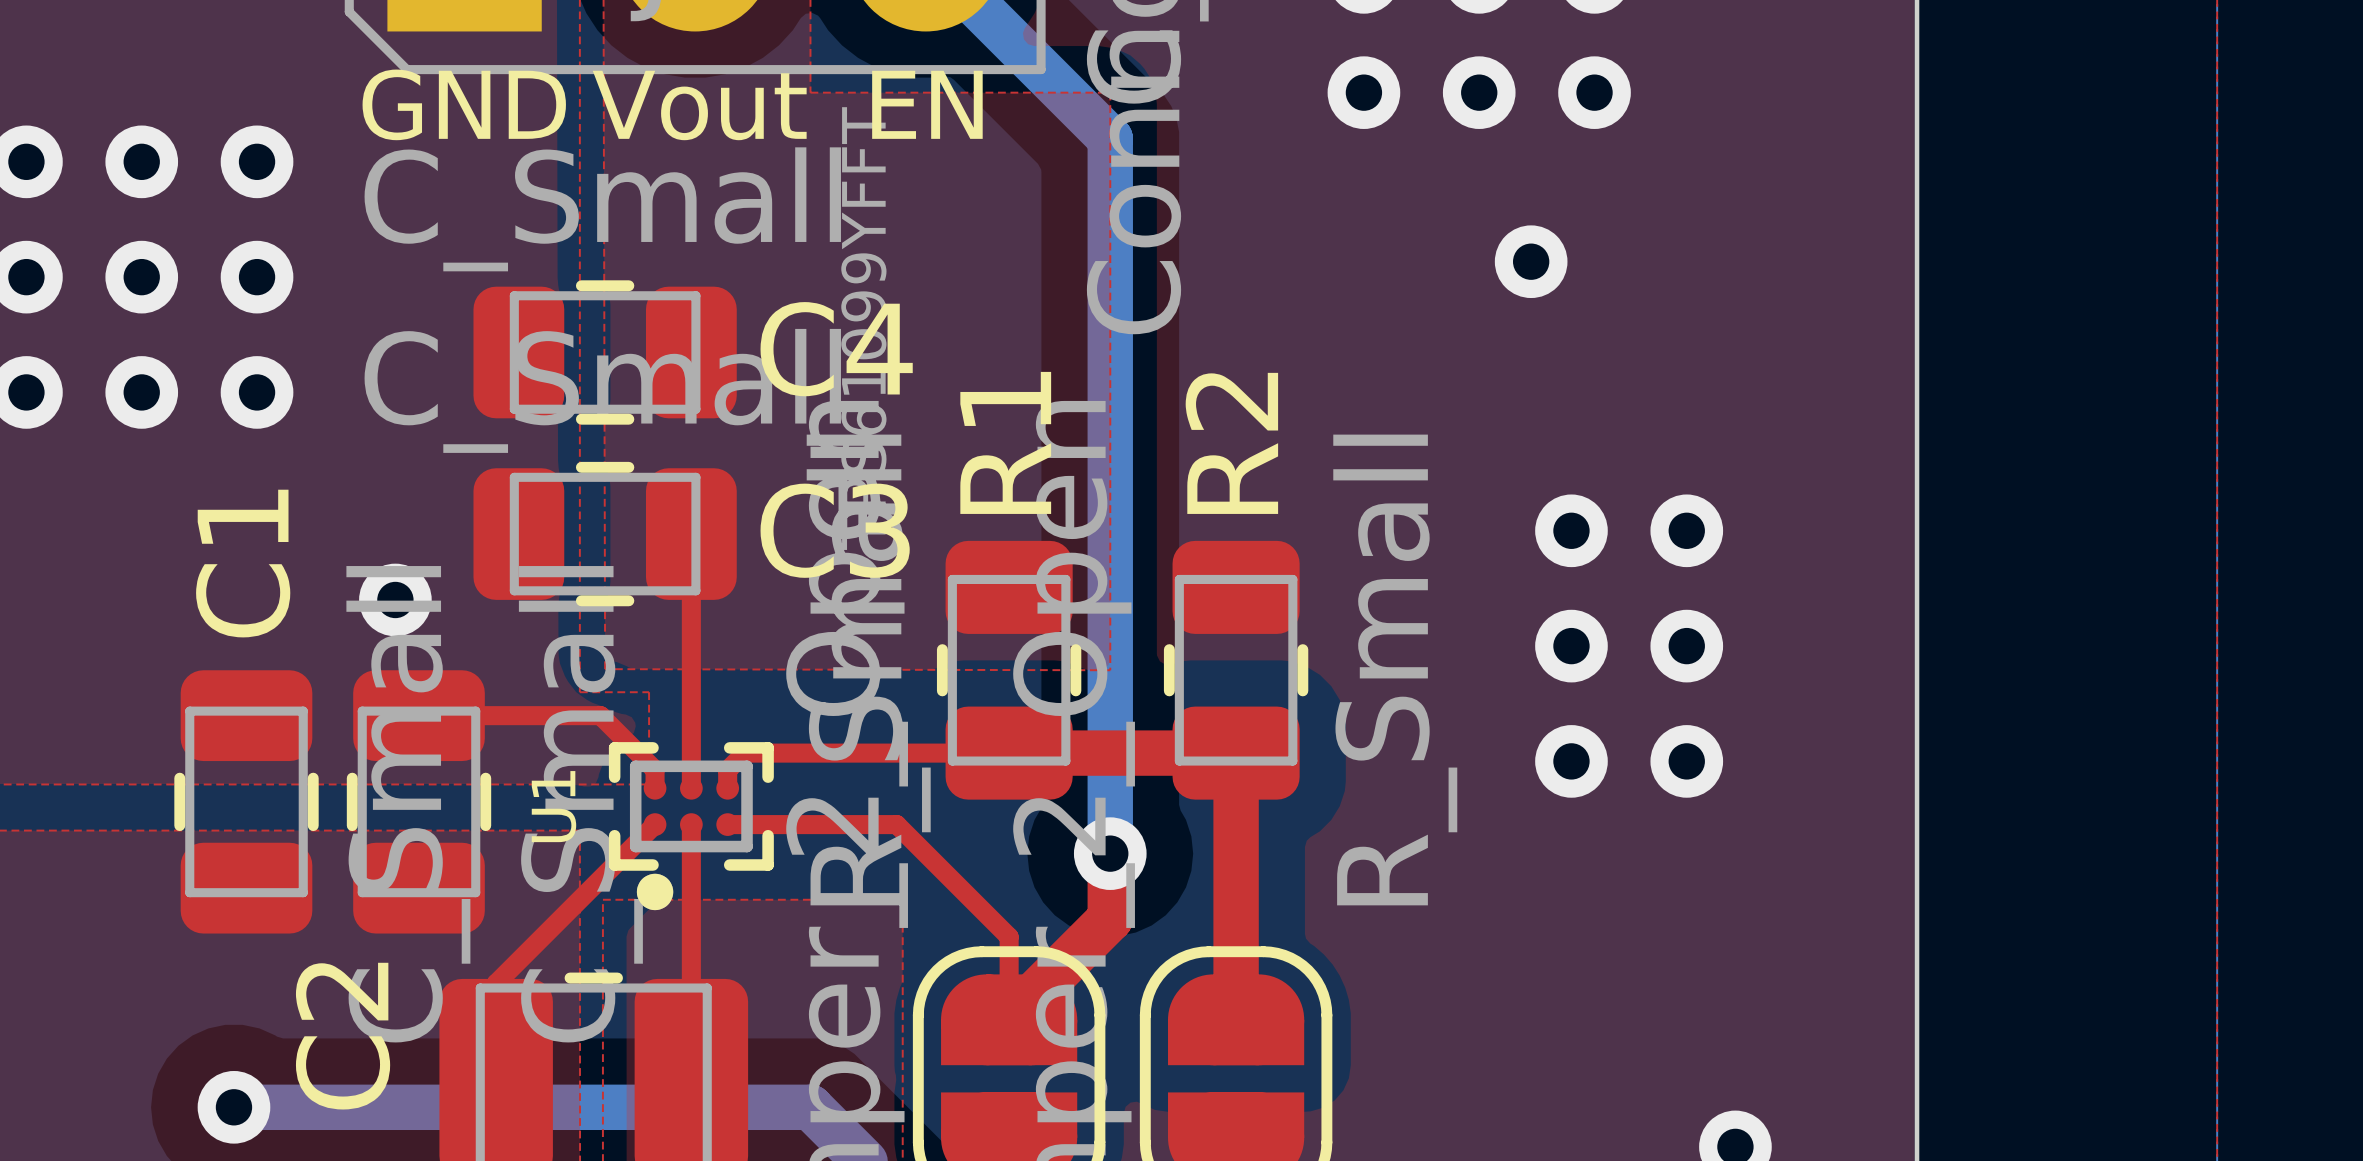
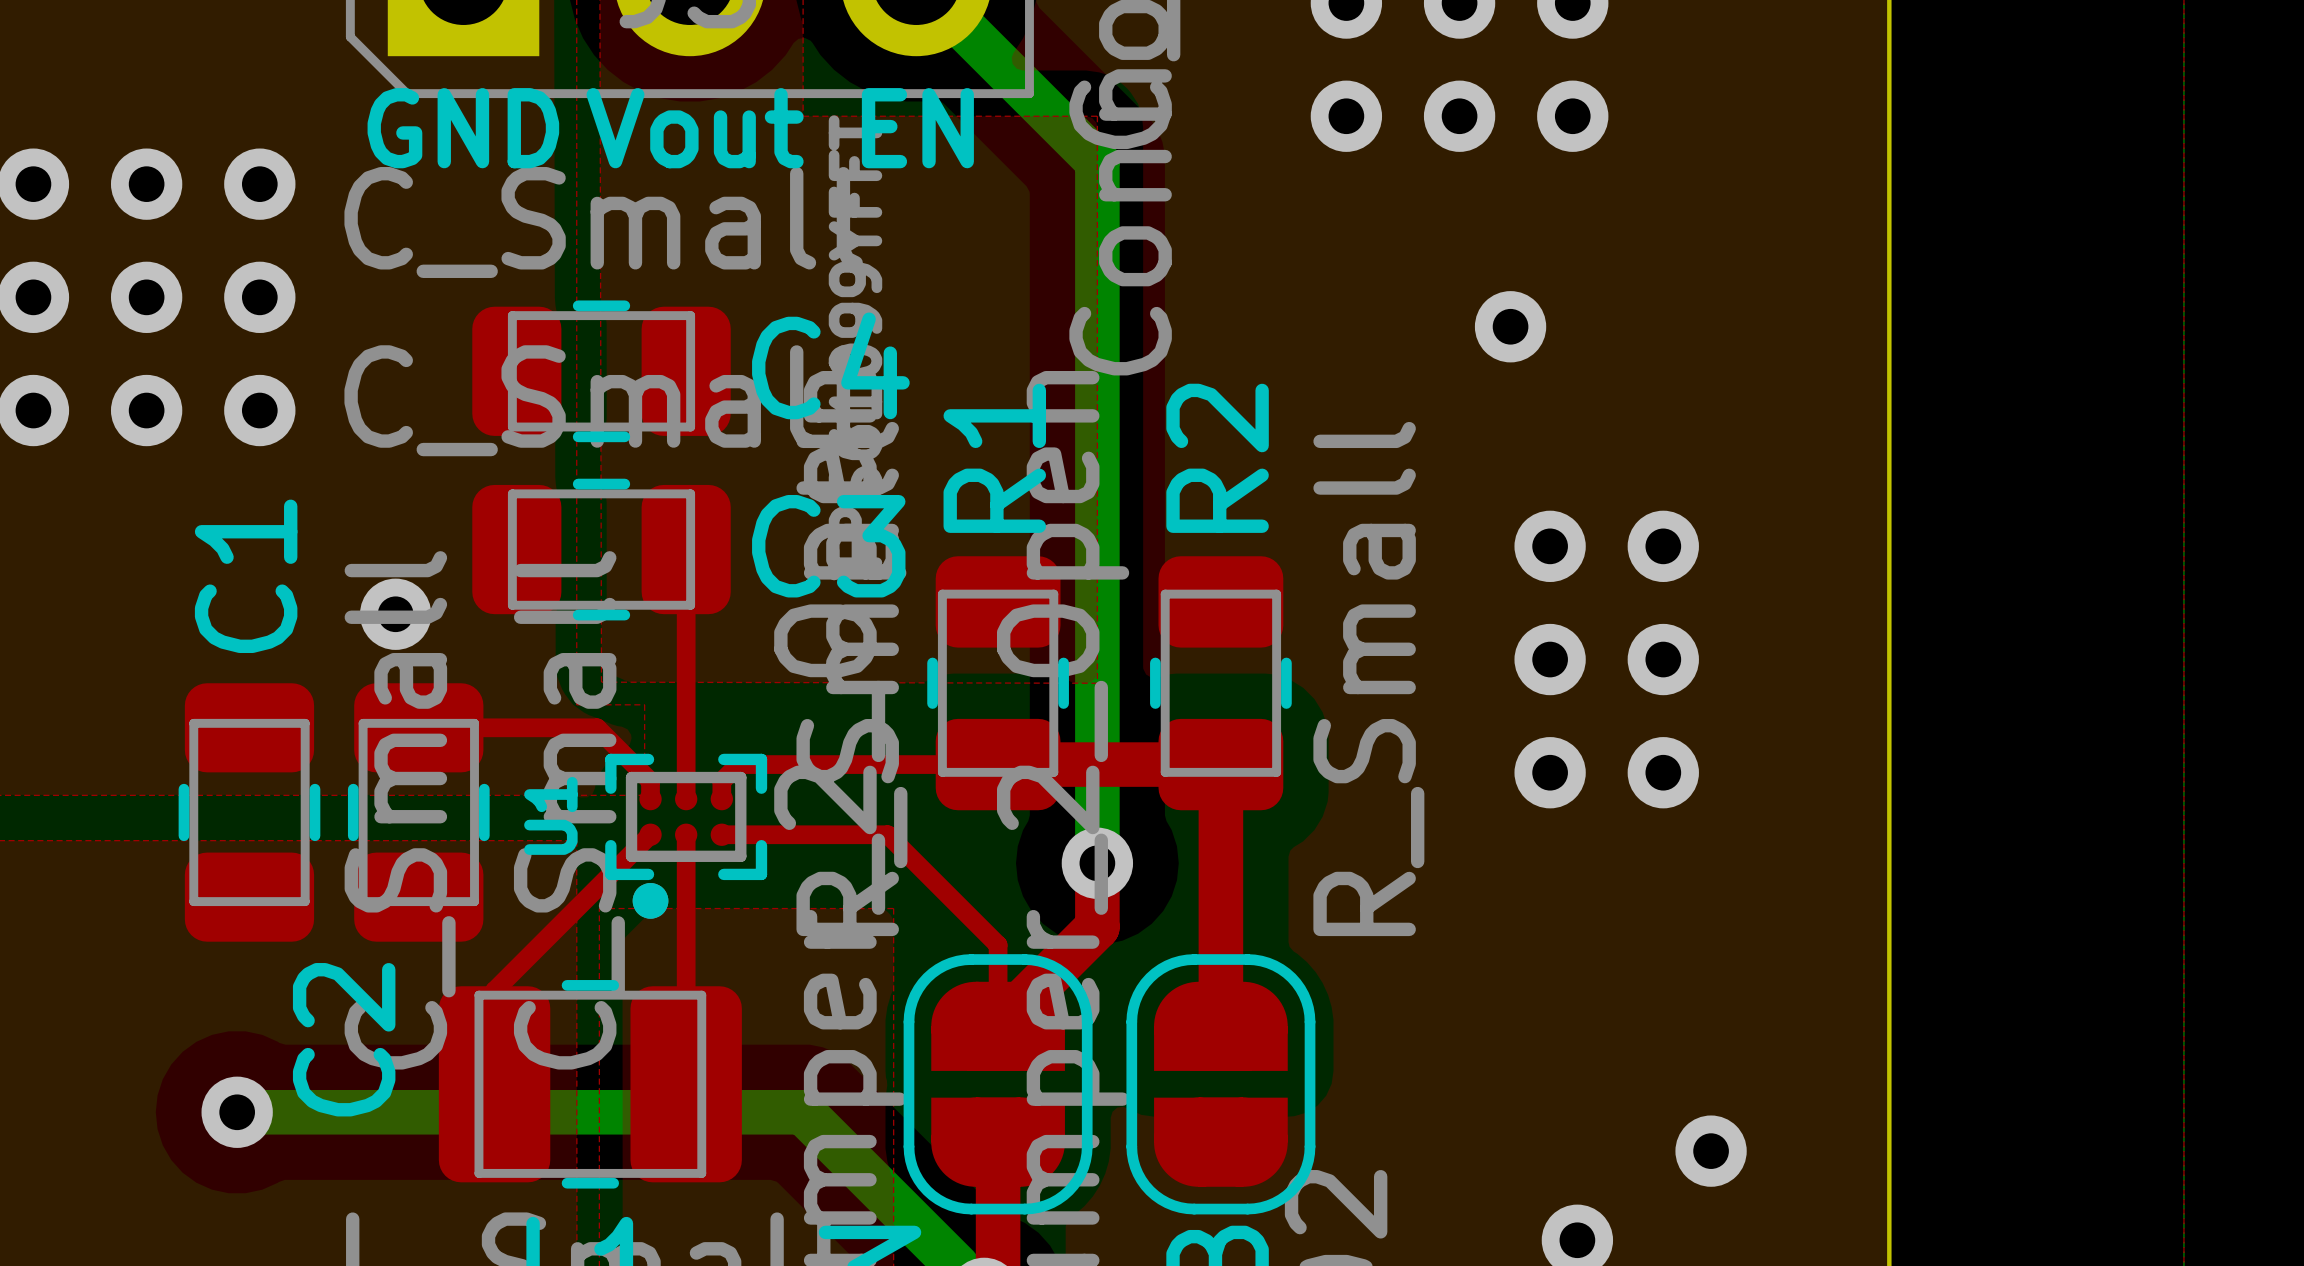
via position: (1531, 261) -> (1510, 326)

